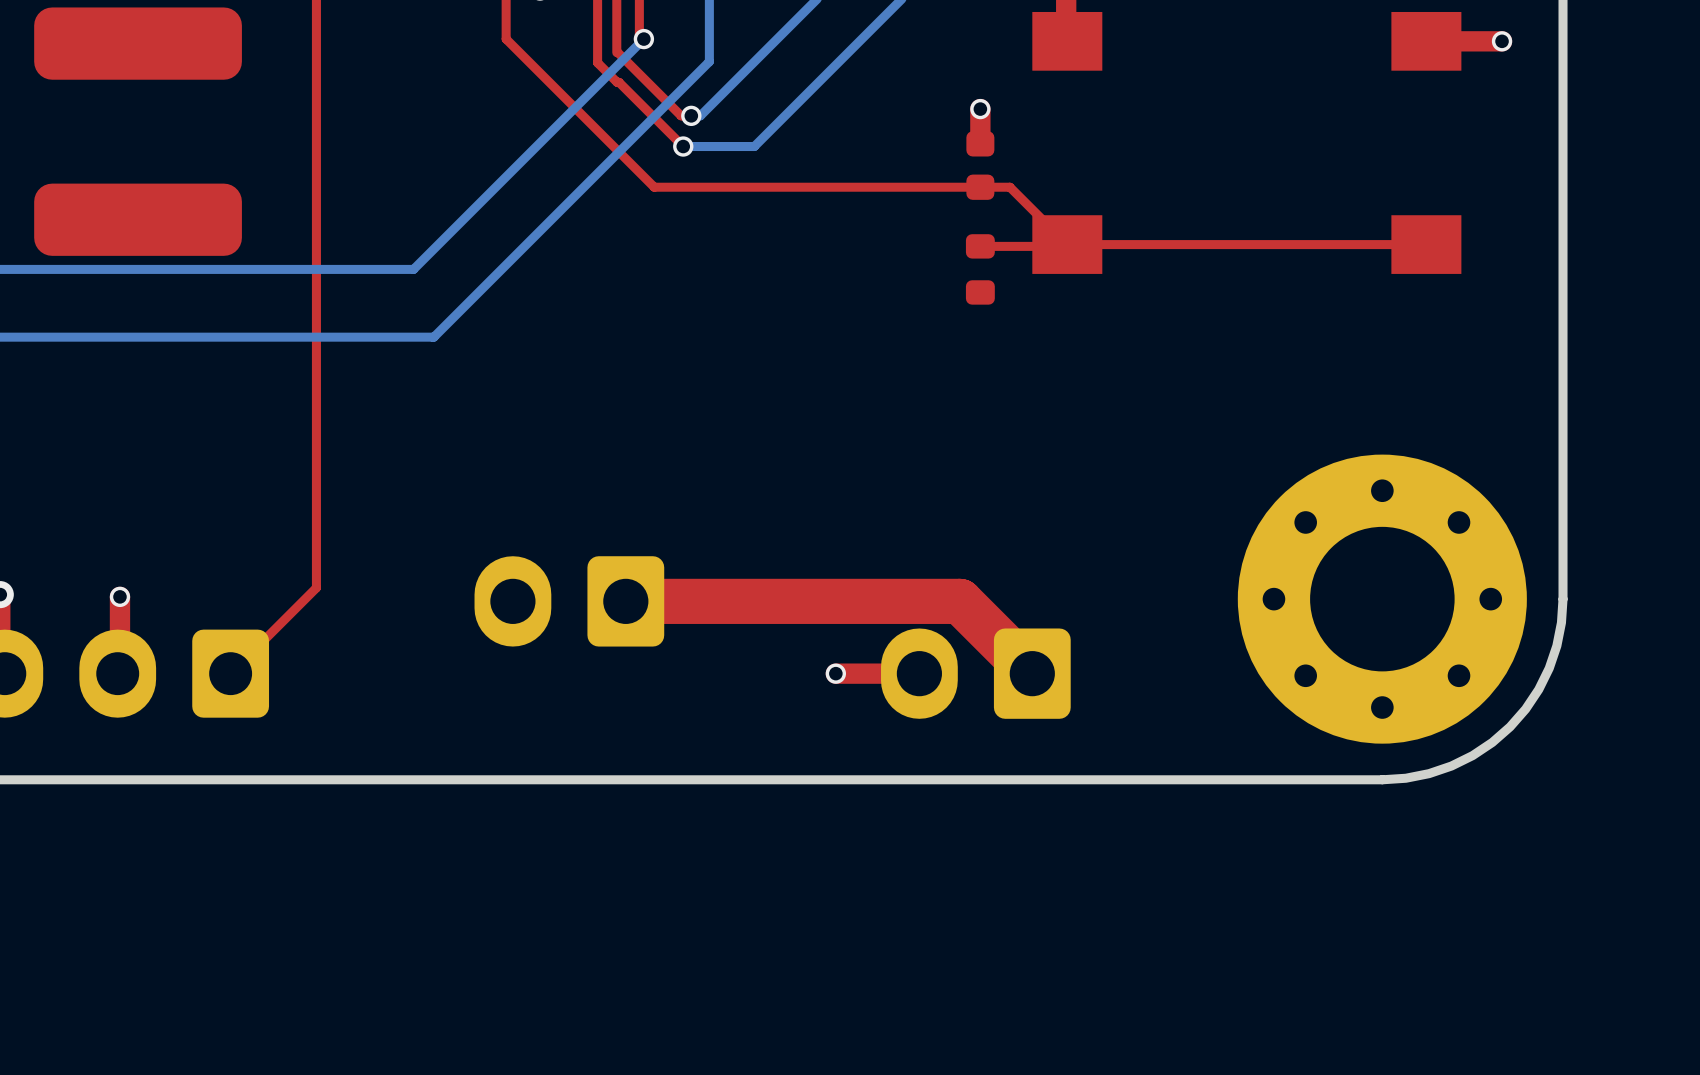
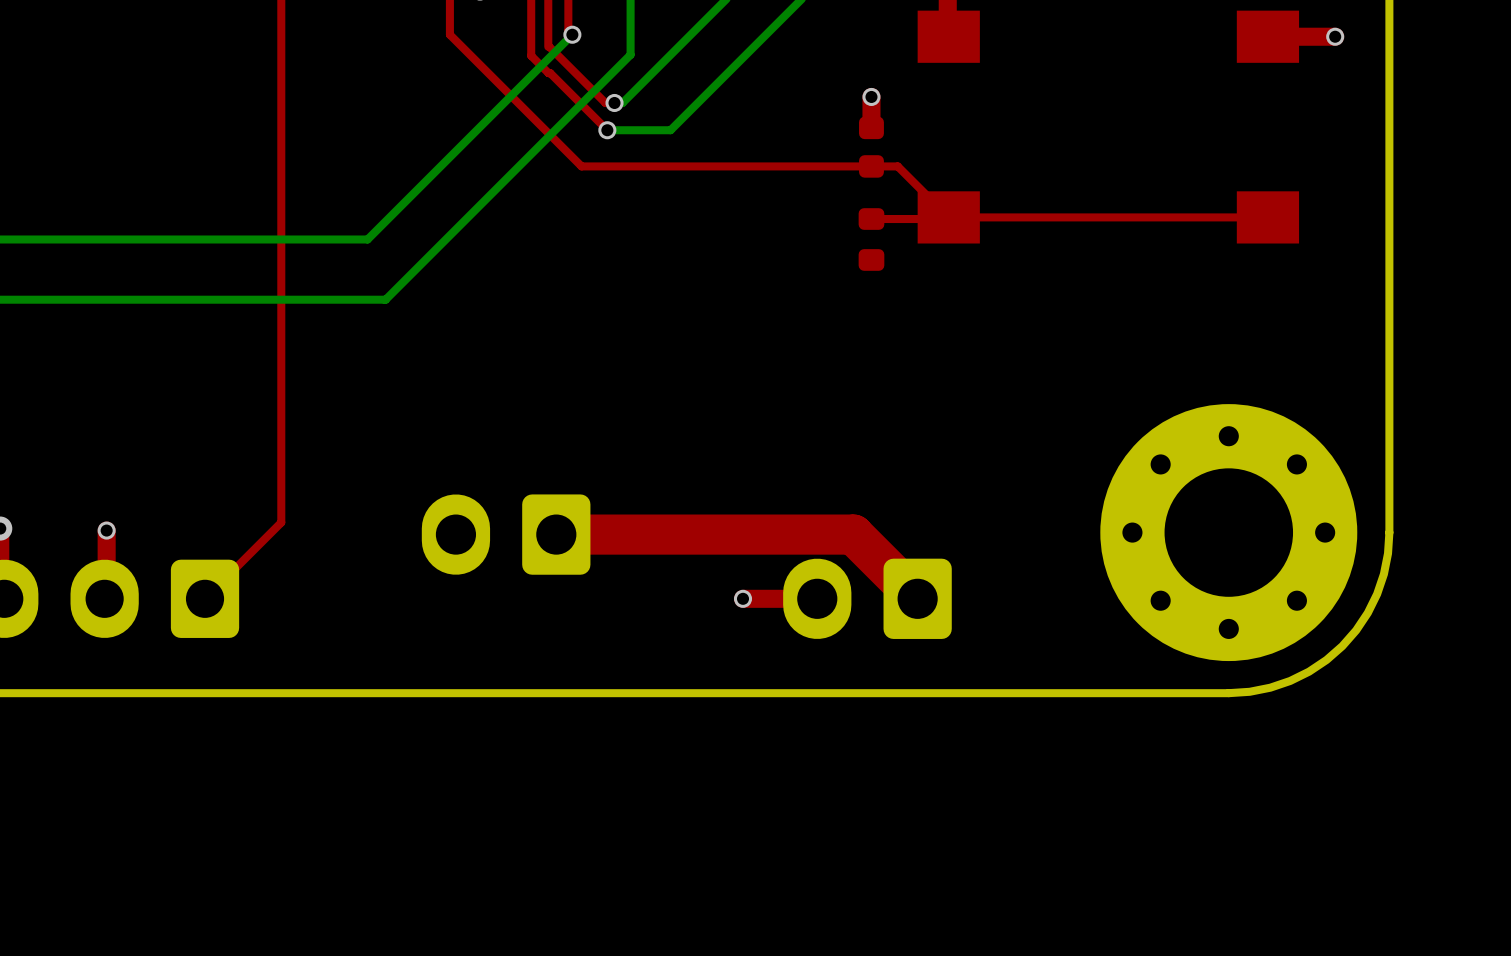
part: (138, 131) -> none

